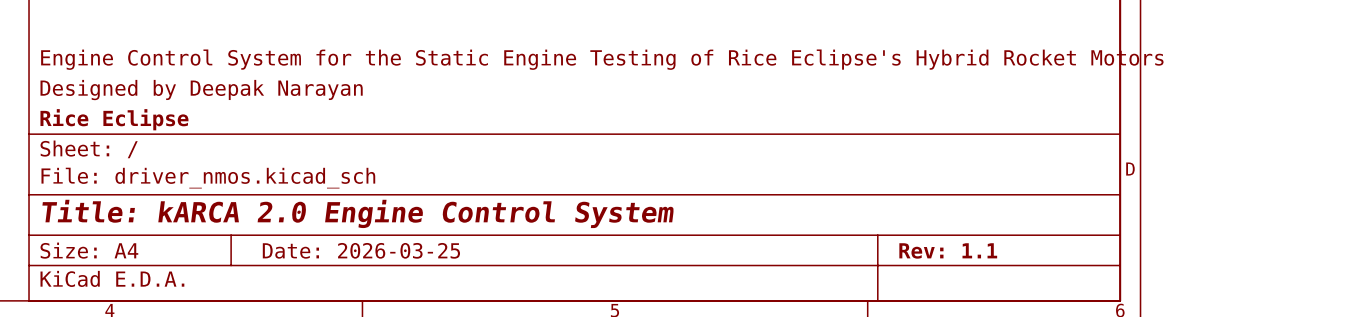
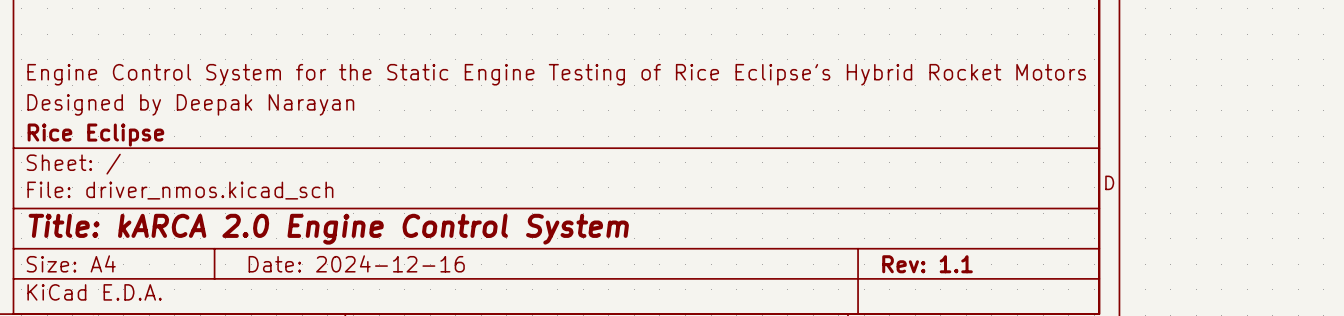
title block: Date: 2026-03-25 (361, 250) -> Date: 2024-12-16 (356, 263)

